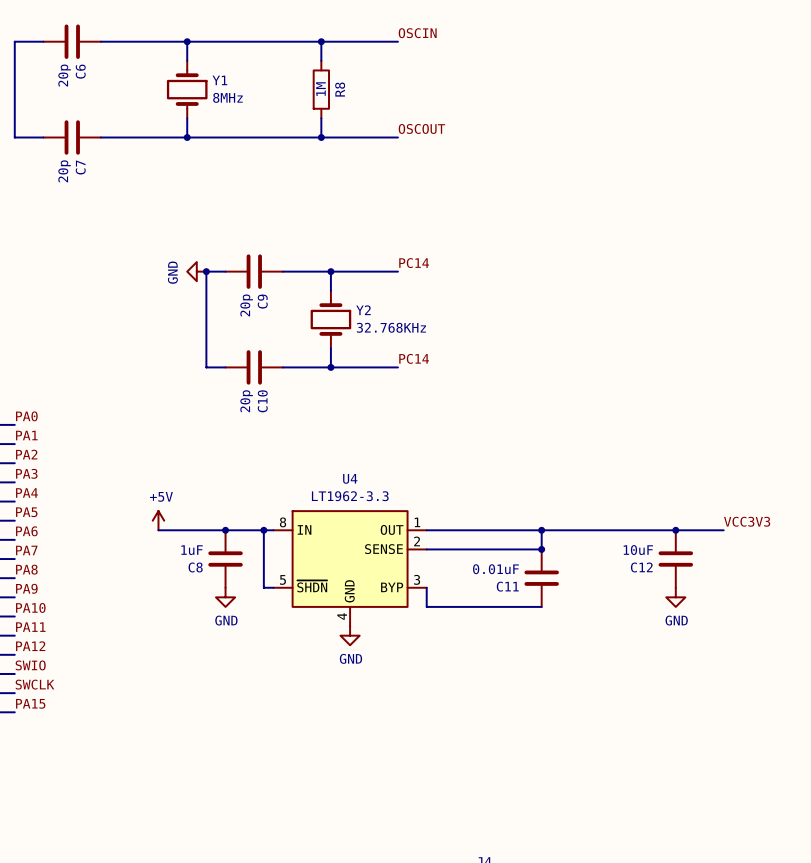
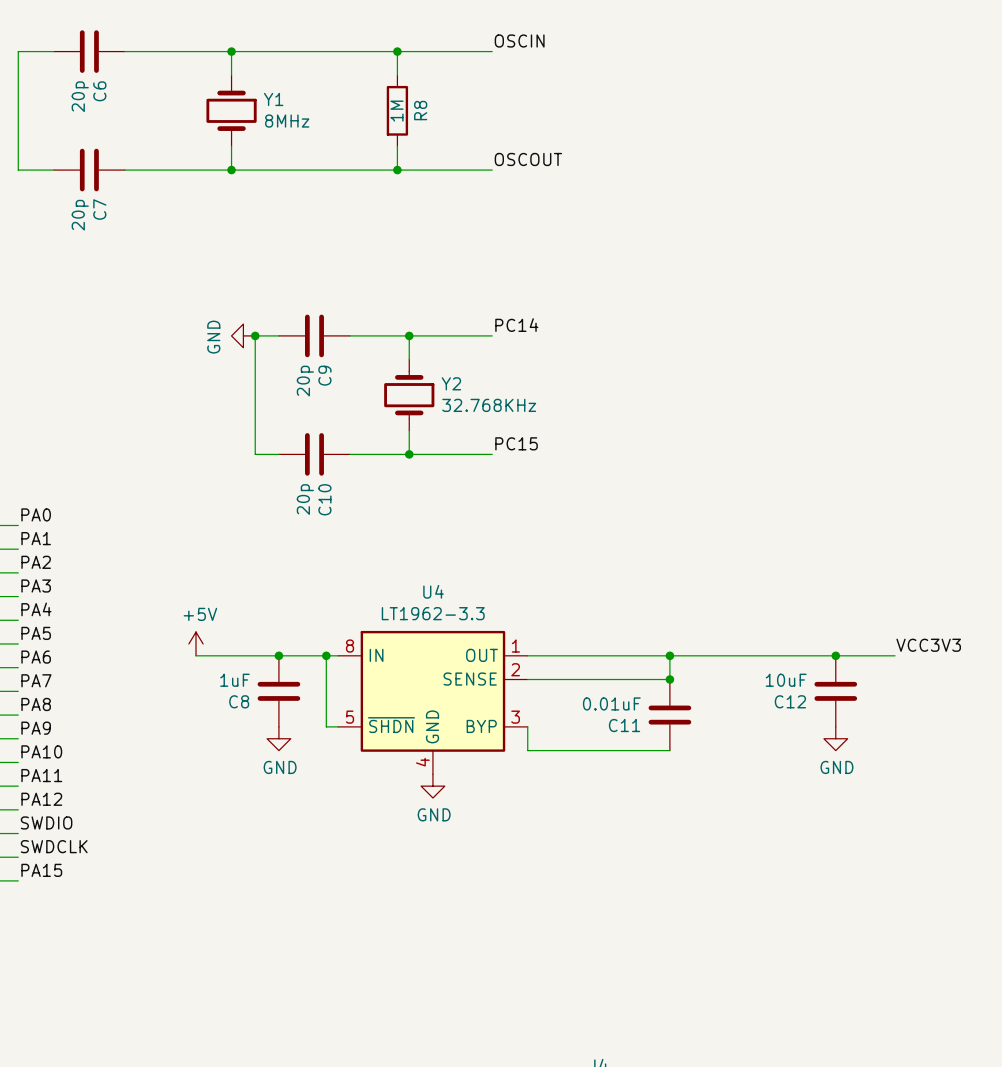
label: PC14 (414, 358) -> PC15 (516, 443)
label: SWIO (30, 665) -> SWDIO (46, 822)
label: SWCLK (34, 684) -> SWDCLK (54, 846)

